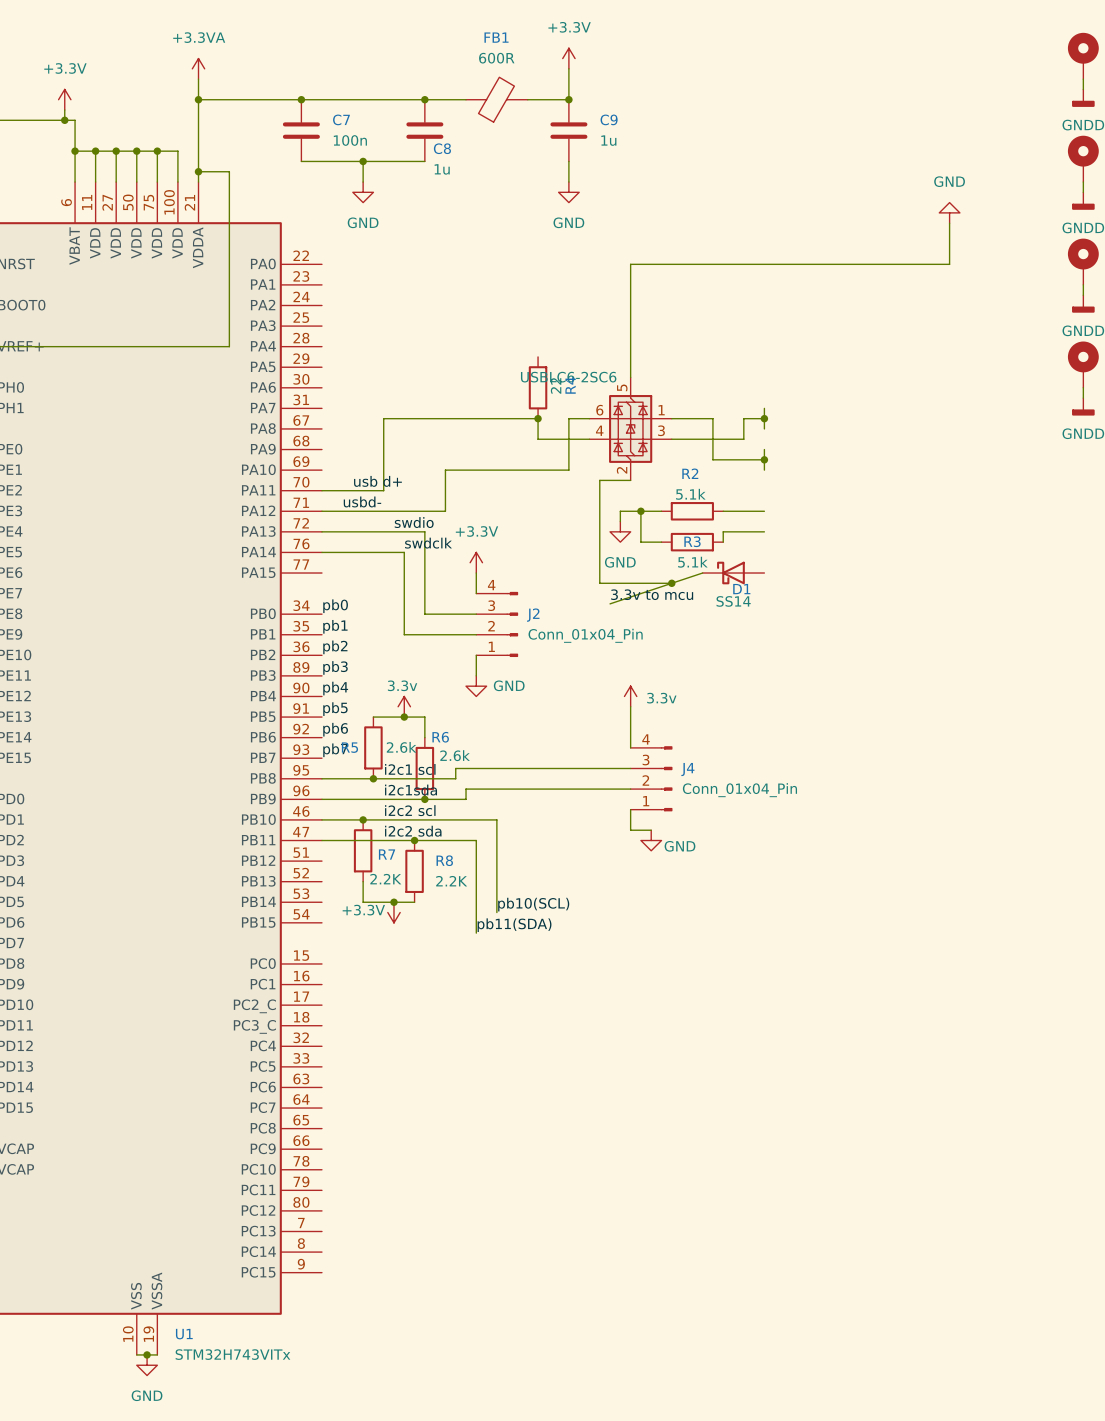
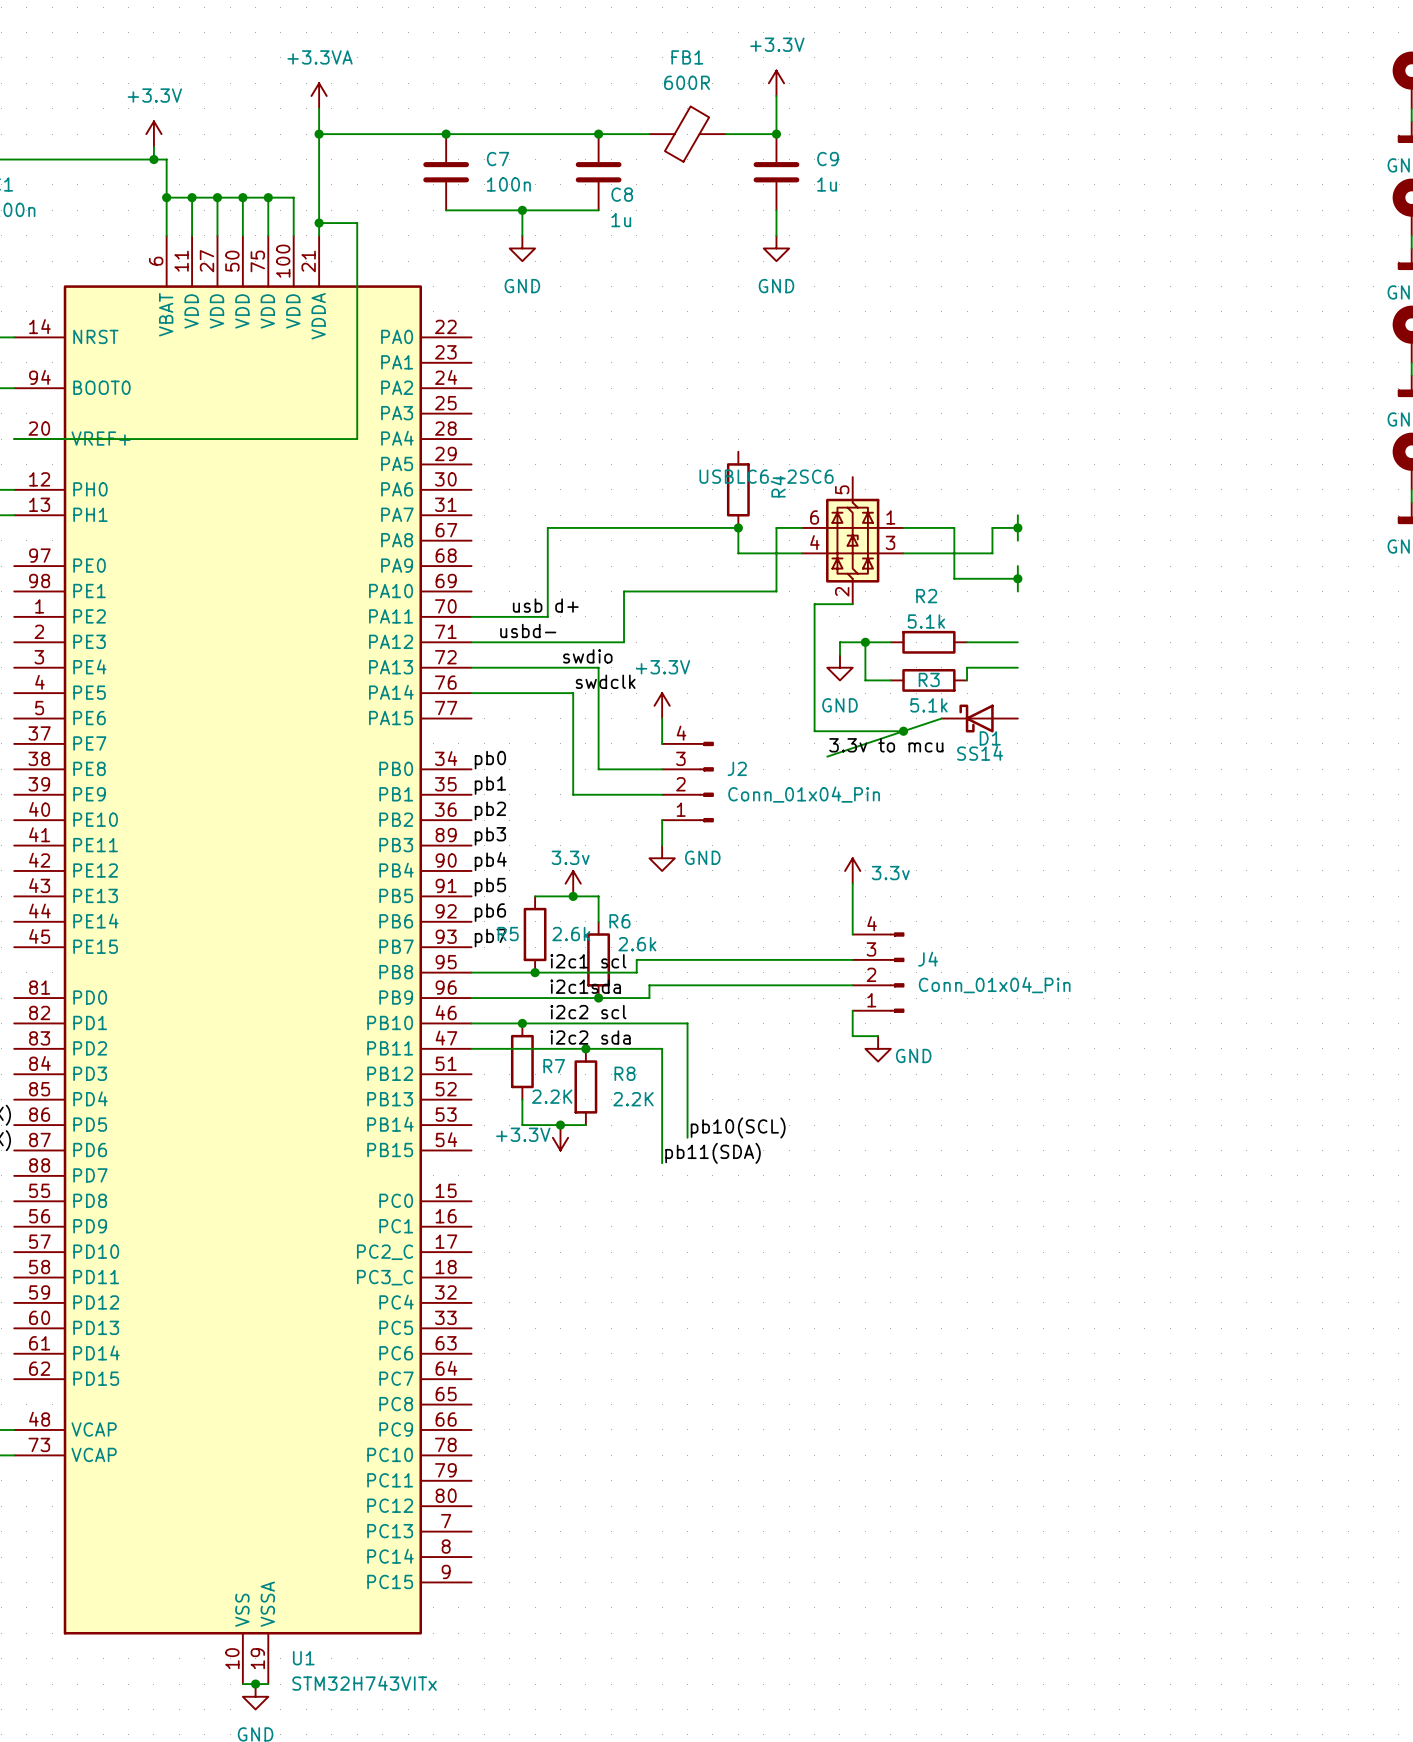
power symbol: GND (949, 212) -> none
wire: (949, 223) (949, 264) (630, 264) (630, 377) -> none
R4 value: 22 (556, 385) -> none

